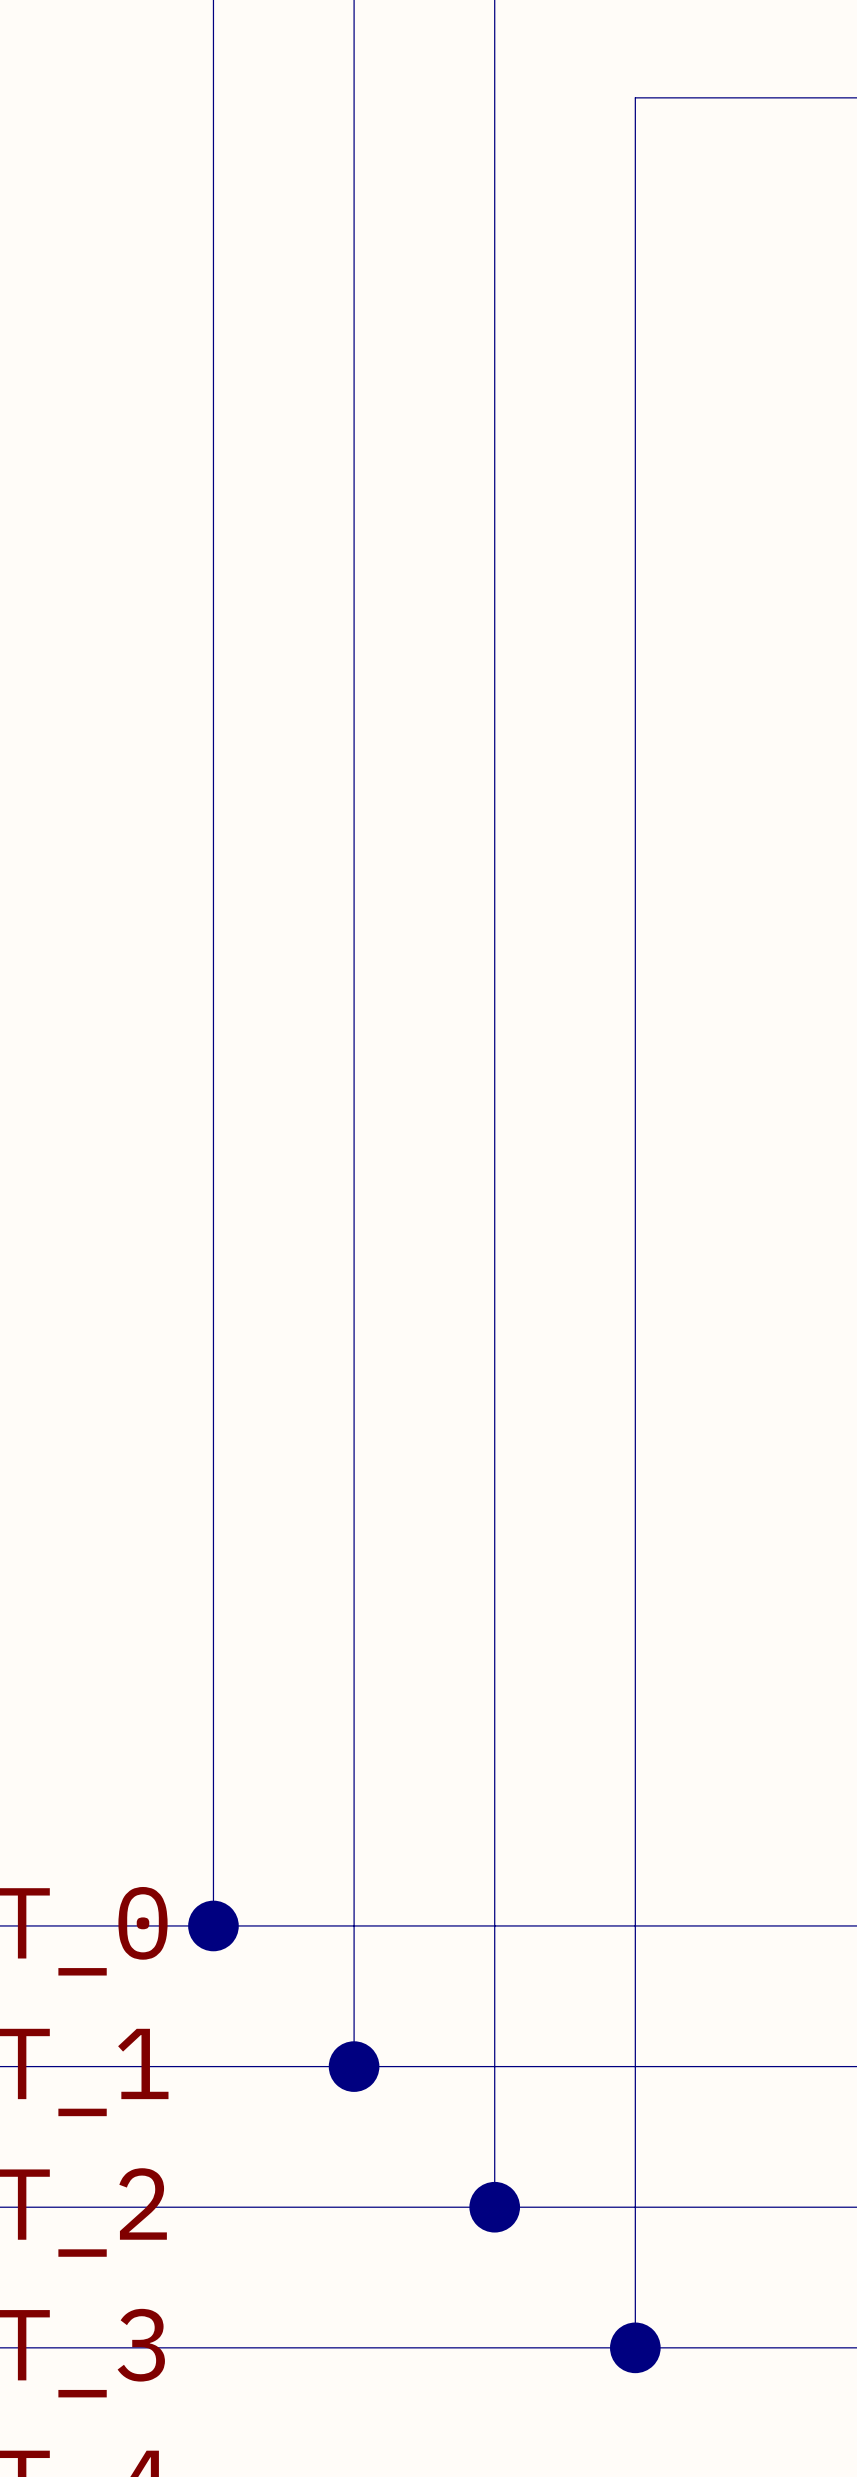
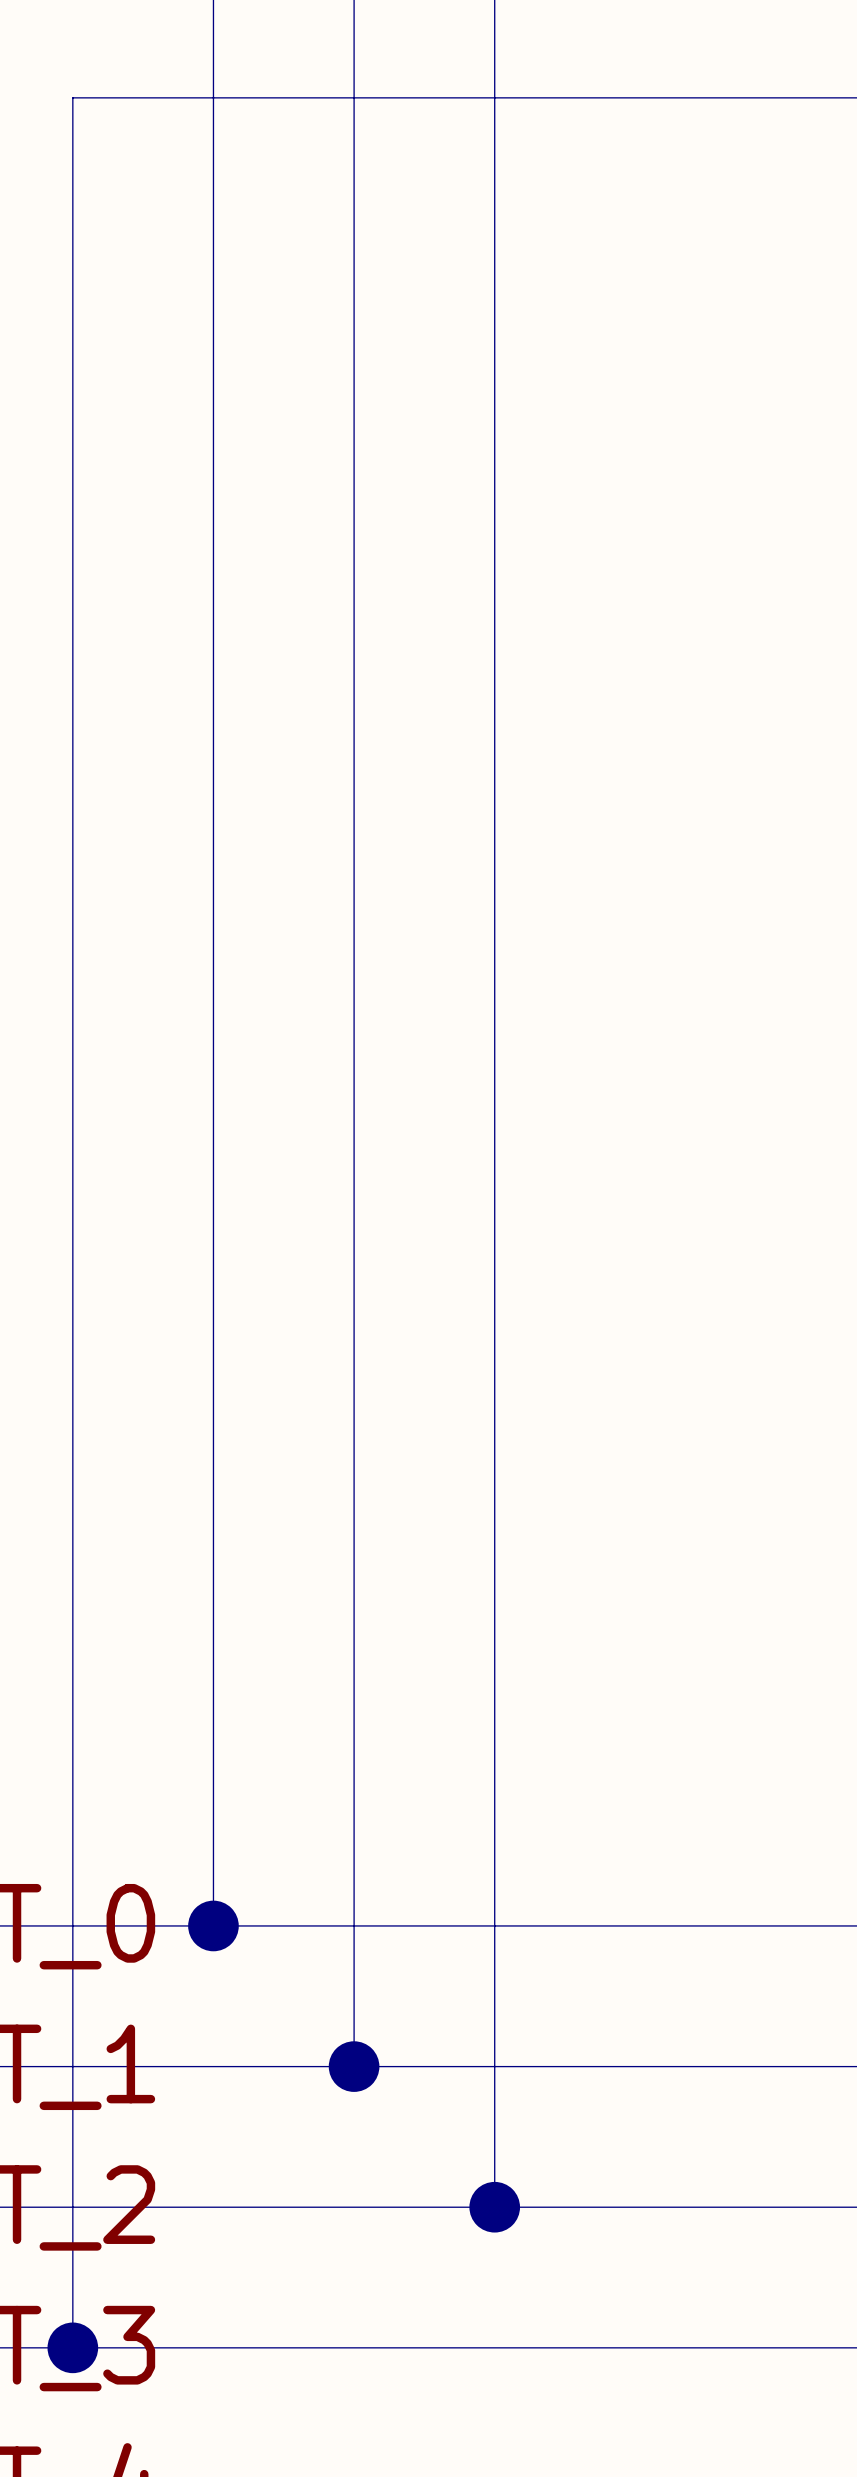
wire: (635, 97) (635, 2347) -> (635, 97) (72, 97) (72, 2347)
junction: none -> (72, 2347)
junction: (635, 2347) -> none

